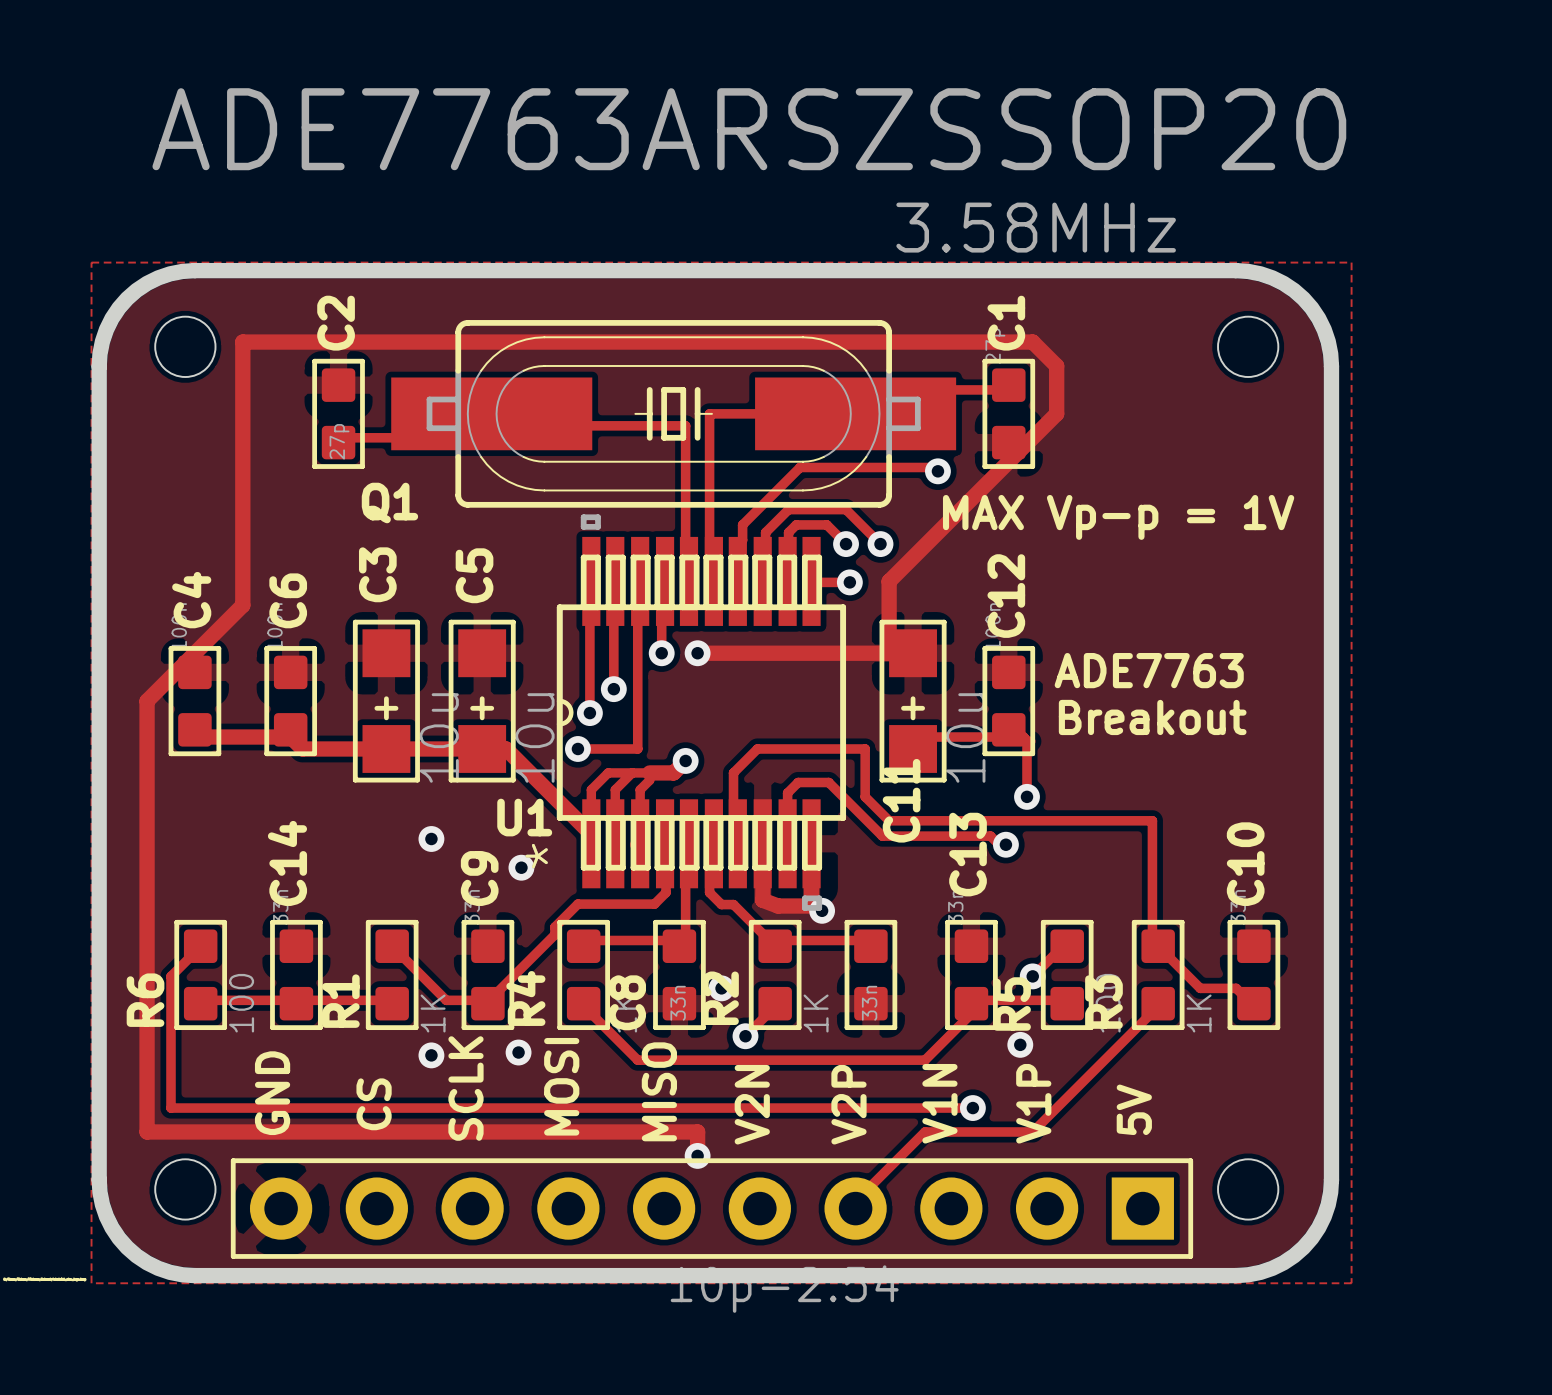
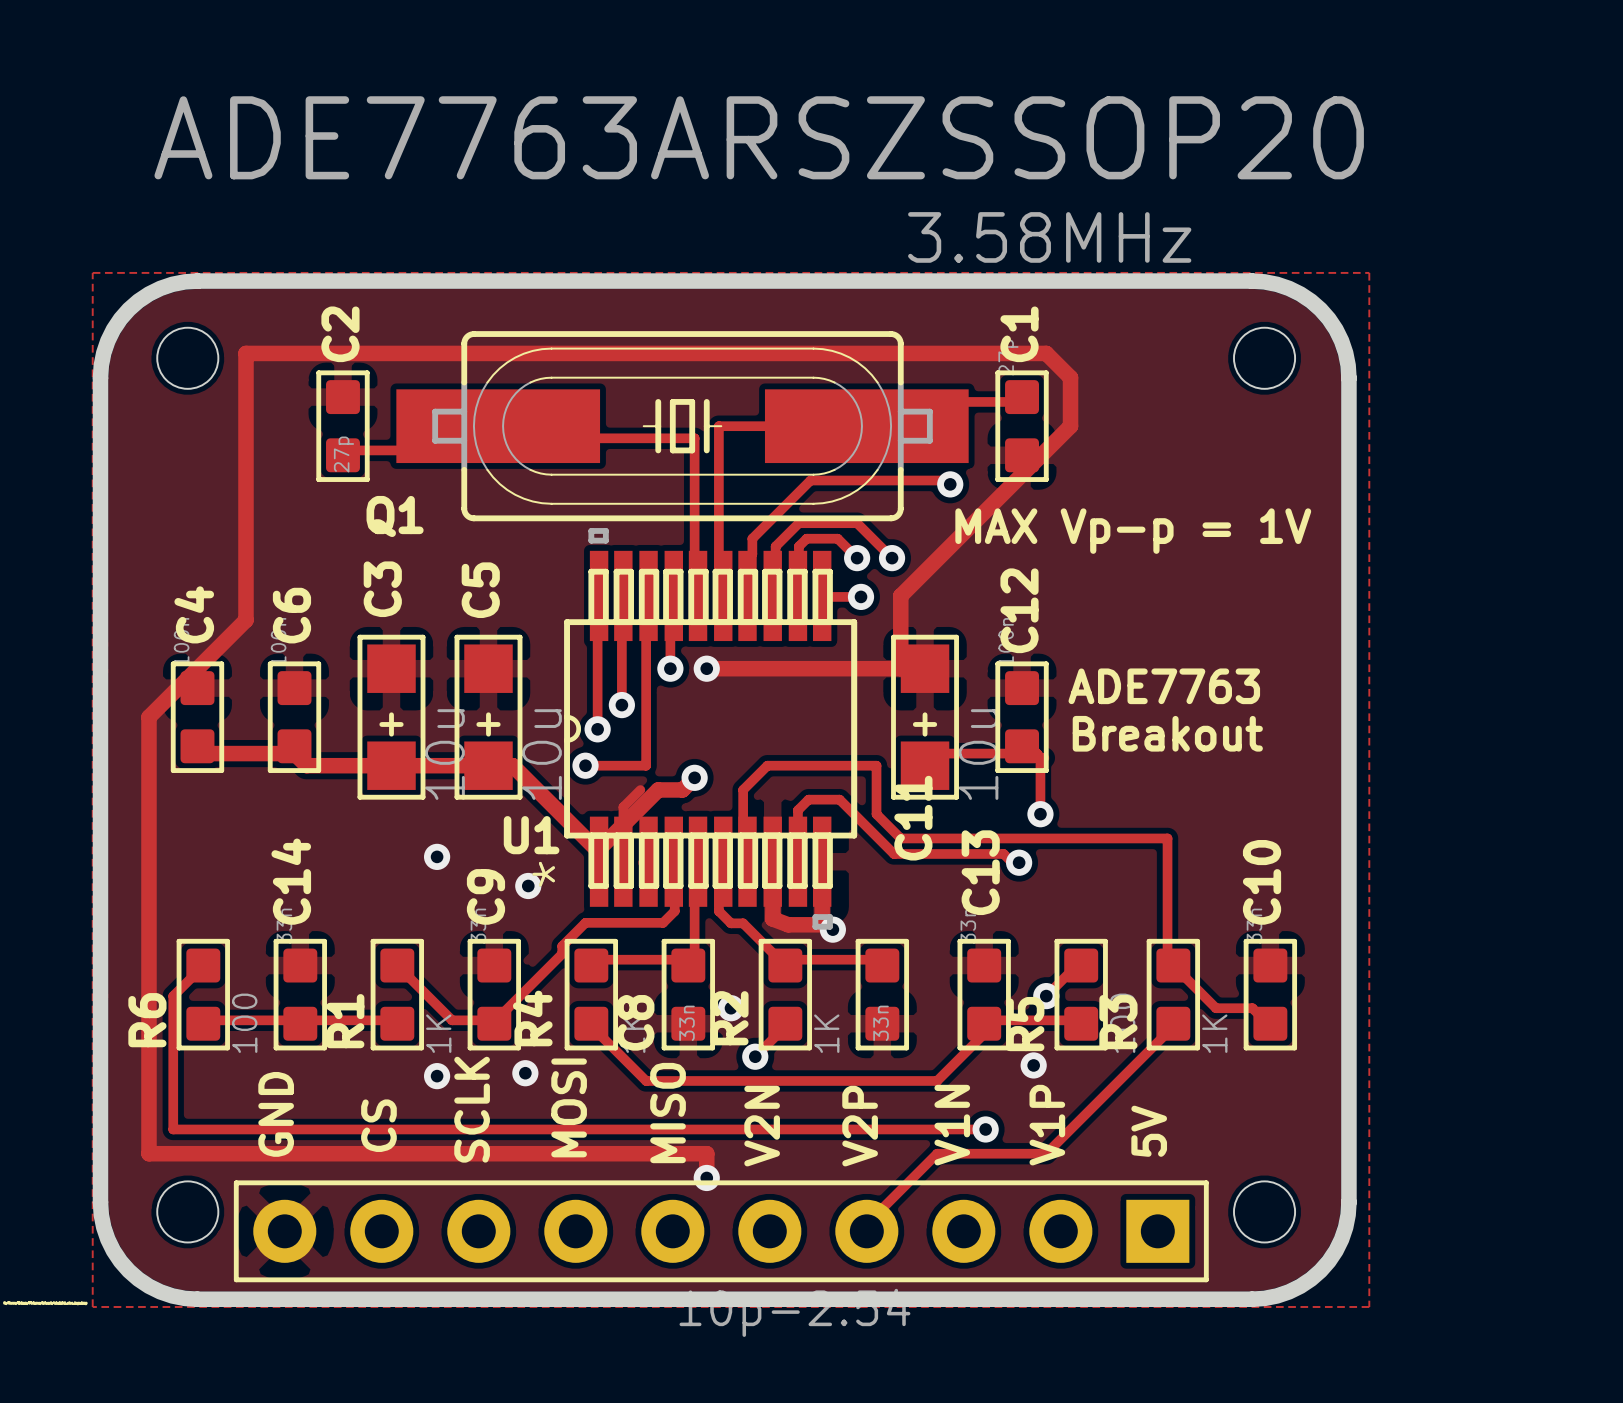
track: none -> (658, 789) (597, 850)
track: (591, 843) (591, 789) (608, 772) (649, 772) (649, 780) (640, 789) (640, 843) -> none

